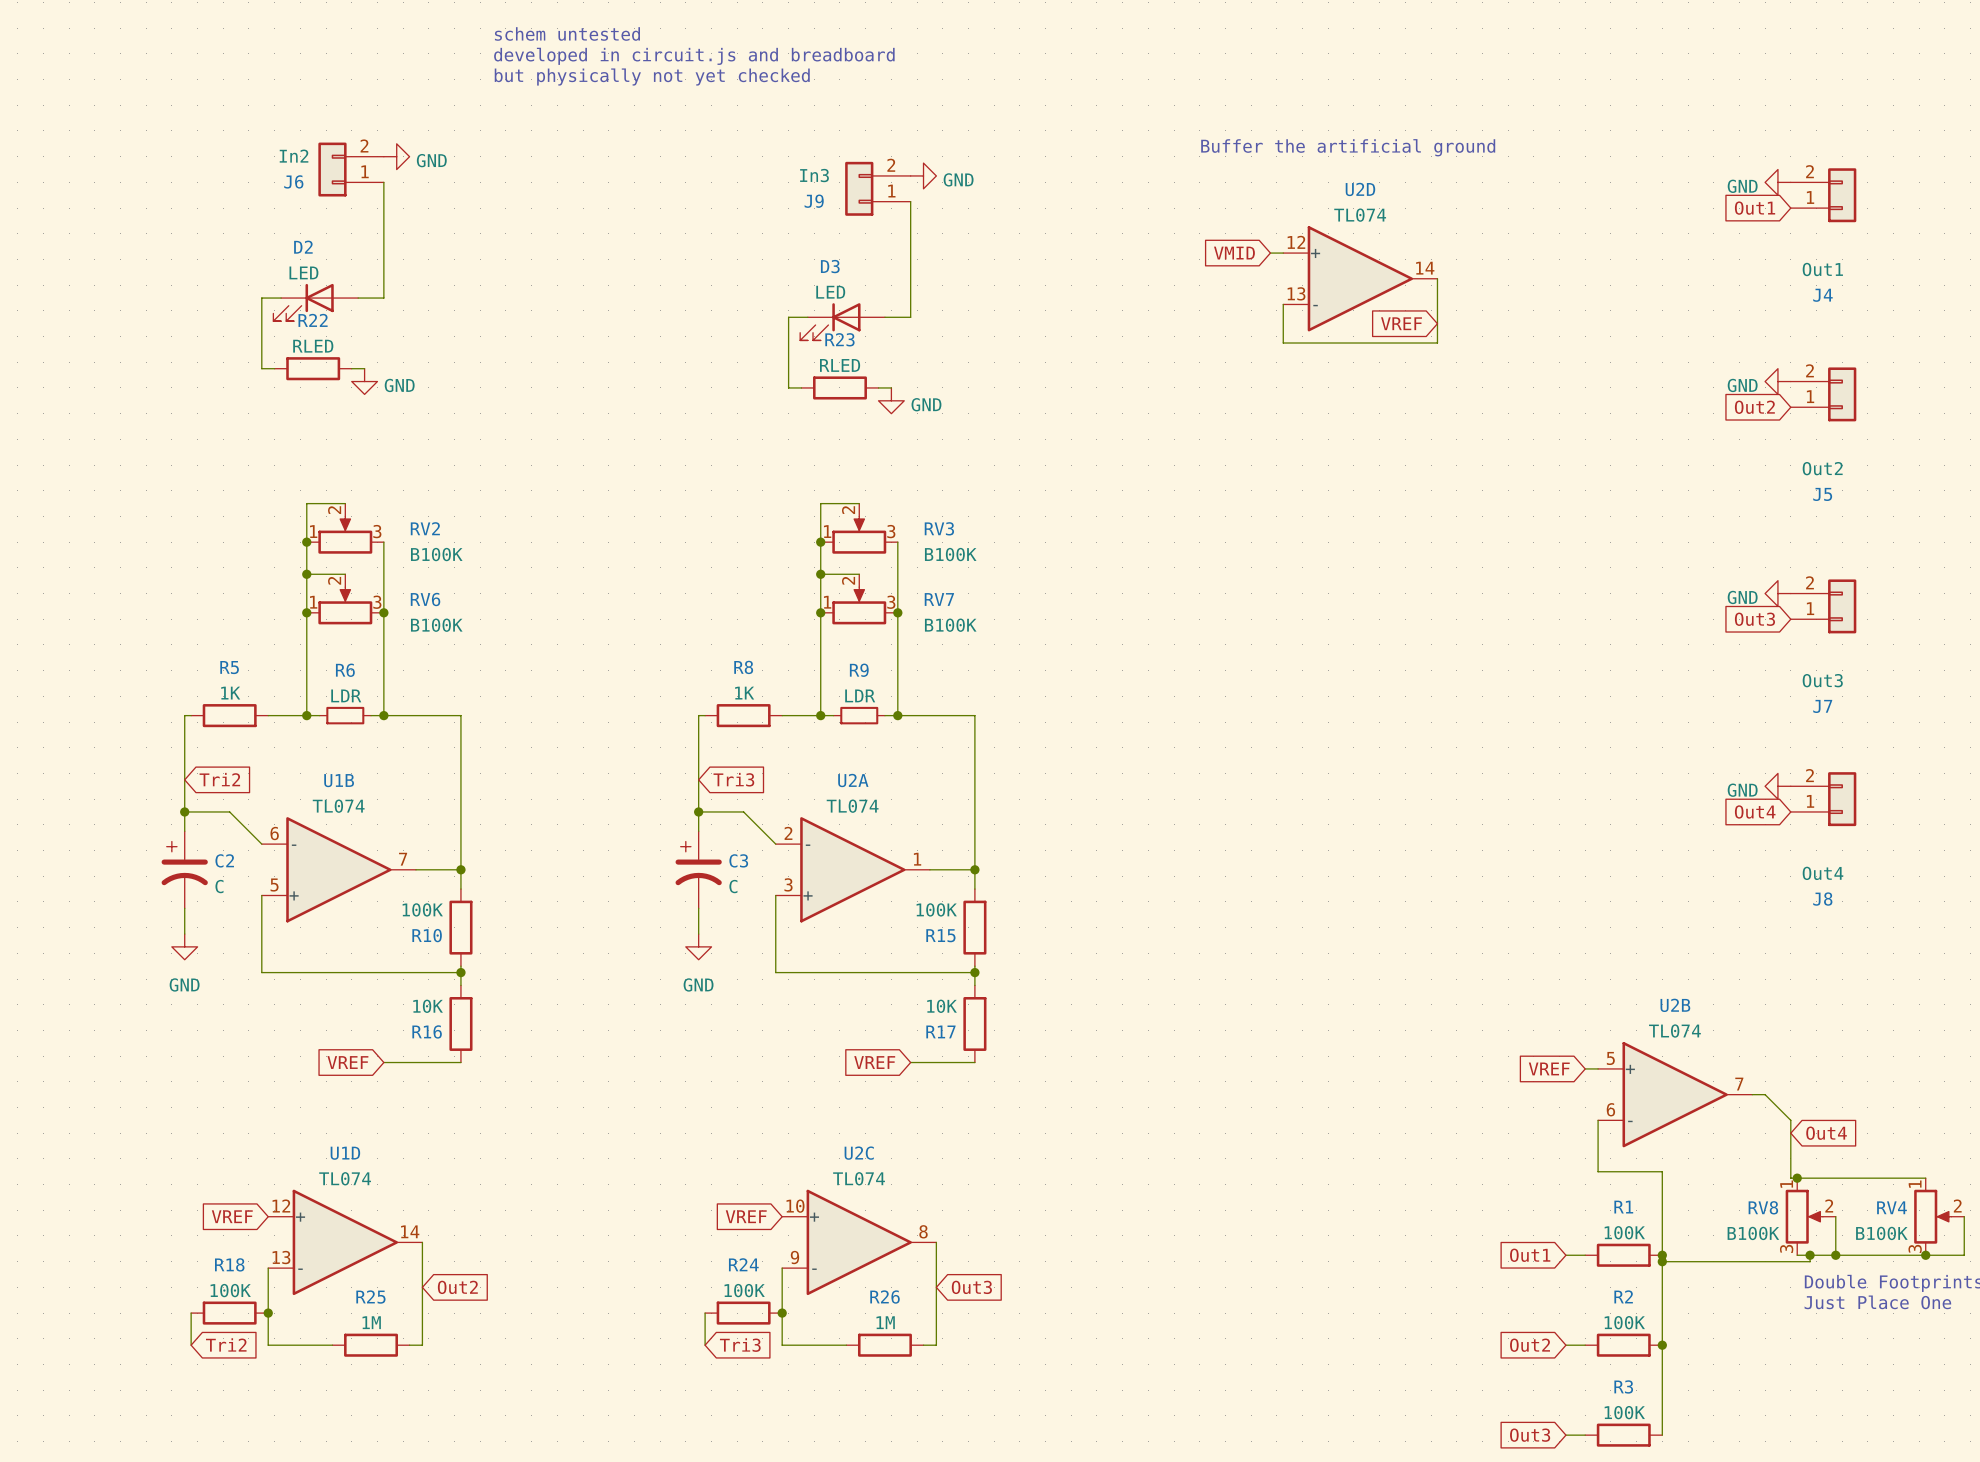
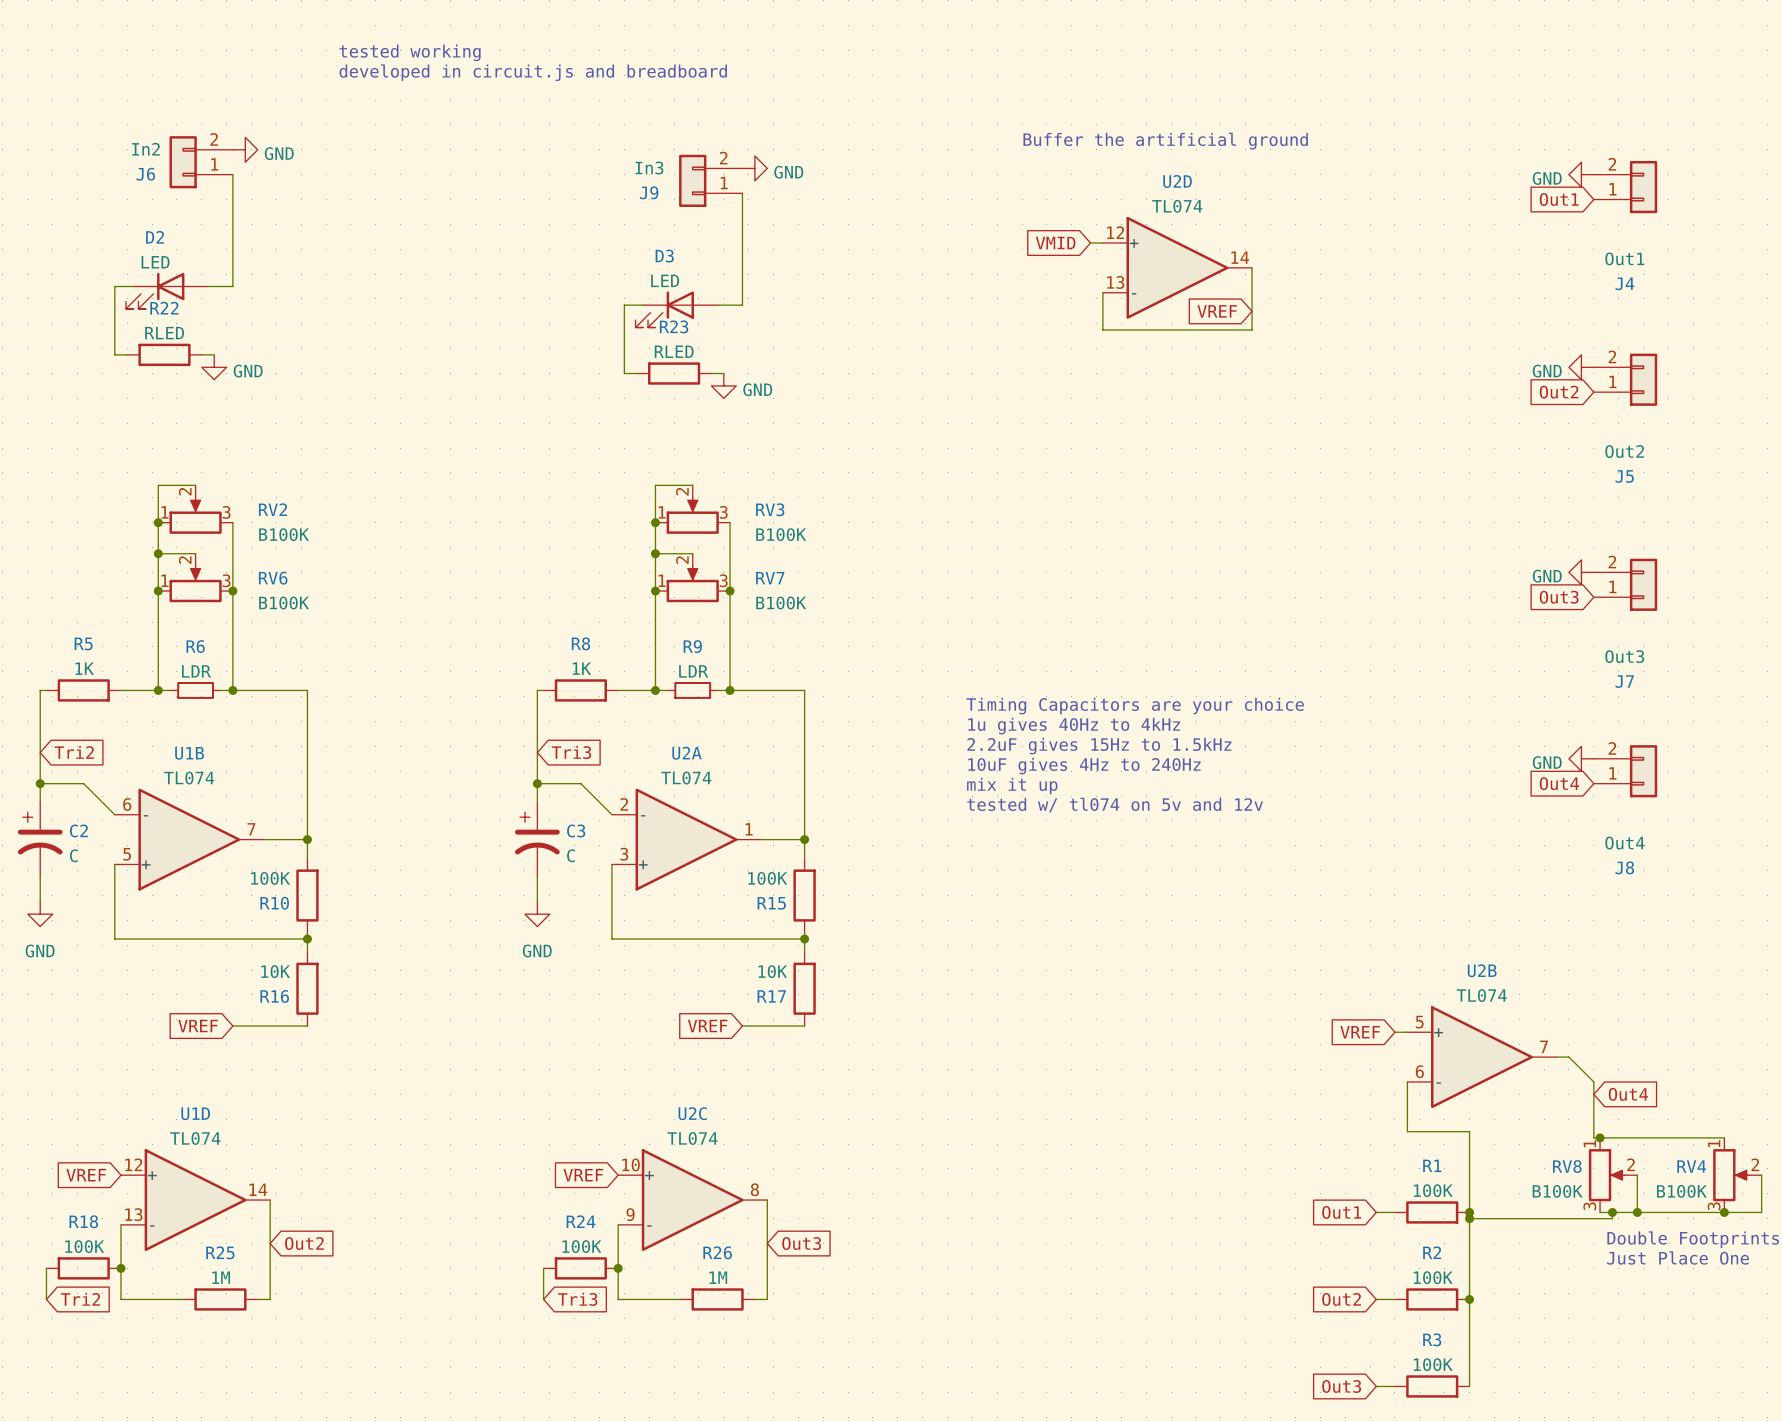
text: schem untested (567, 33) -> none
text: developed in circuit.js and breadboard (694, 56) -> tested working (410, 52)
text: but physically not yet checked (652, 77) -> developed in circuit.js and breadboard (533, 72)
text: none -> Timing Capacitors are your choice (1135, 706)
text: none -> 1u gives 40Hz to 4kHz (1074, 726)
text: none -> 2.2uF gives 15Hz to 1.5kHz (1099, 746)
text: none -> 10uF gives 4Hz to 240Hz (1084, 766)
text: none -> mix it up (1012, 786)
text: none -> tested w/ tl074 on 5v and 12v (1115, 805)

